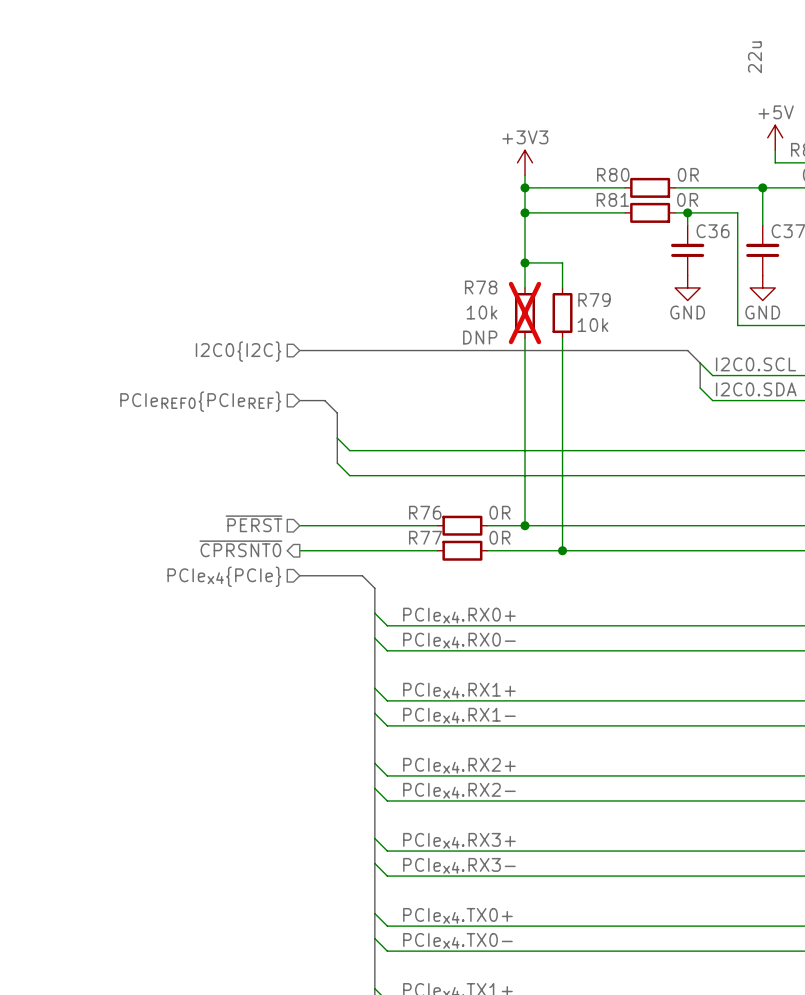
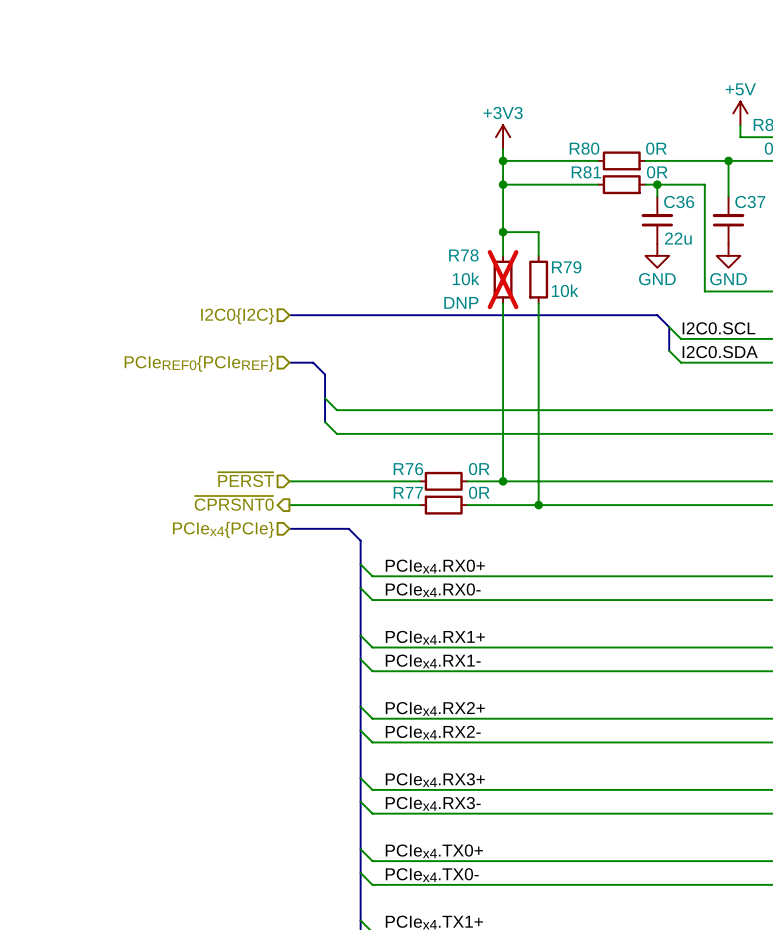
C36 text rotation: 0° (754, 57) -> 90° clockwise (678, 238)
C36 text position: 22u (754, 57) -> 22u (678, 238)

